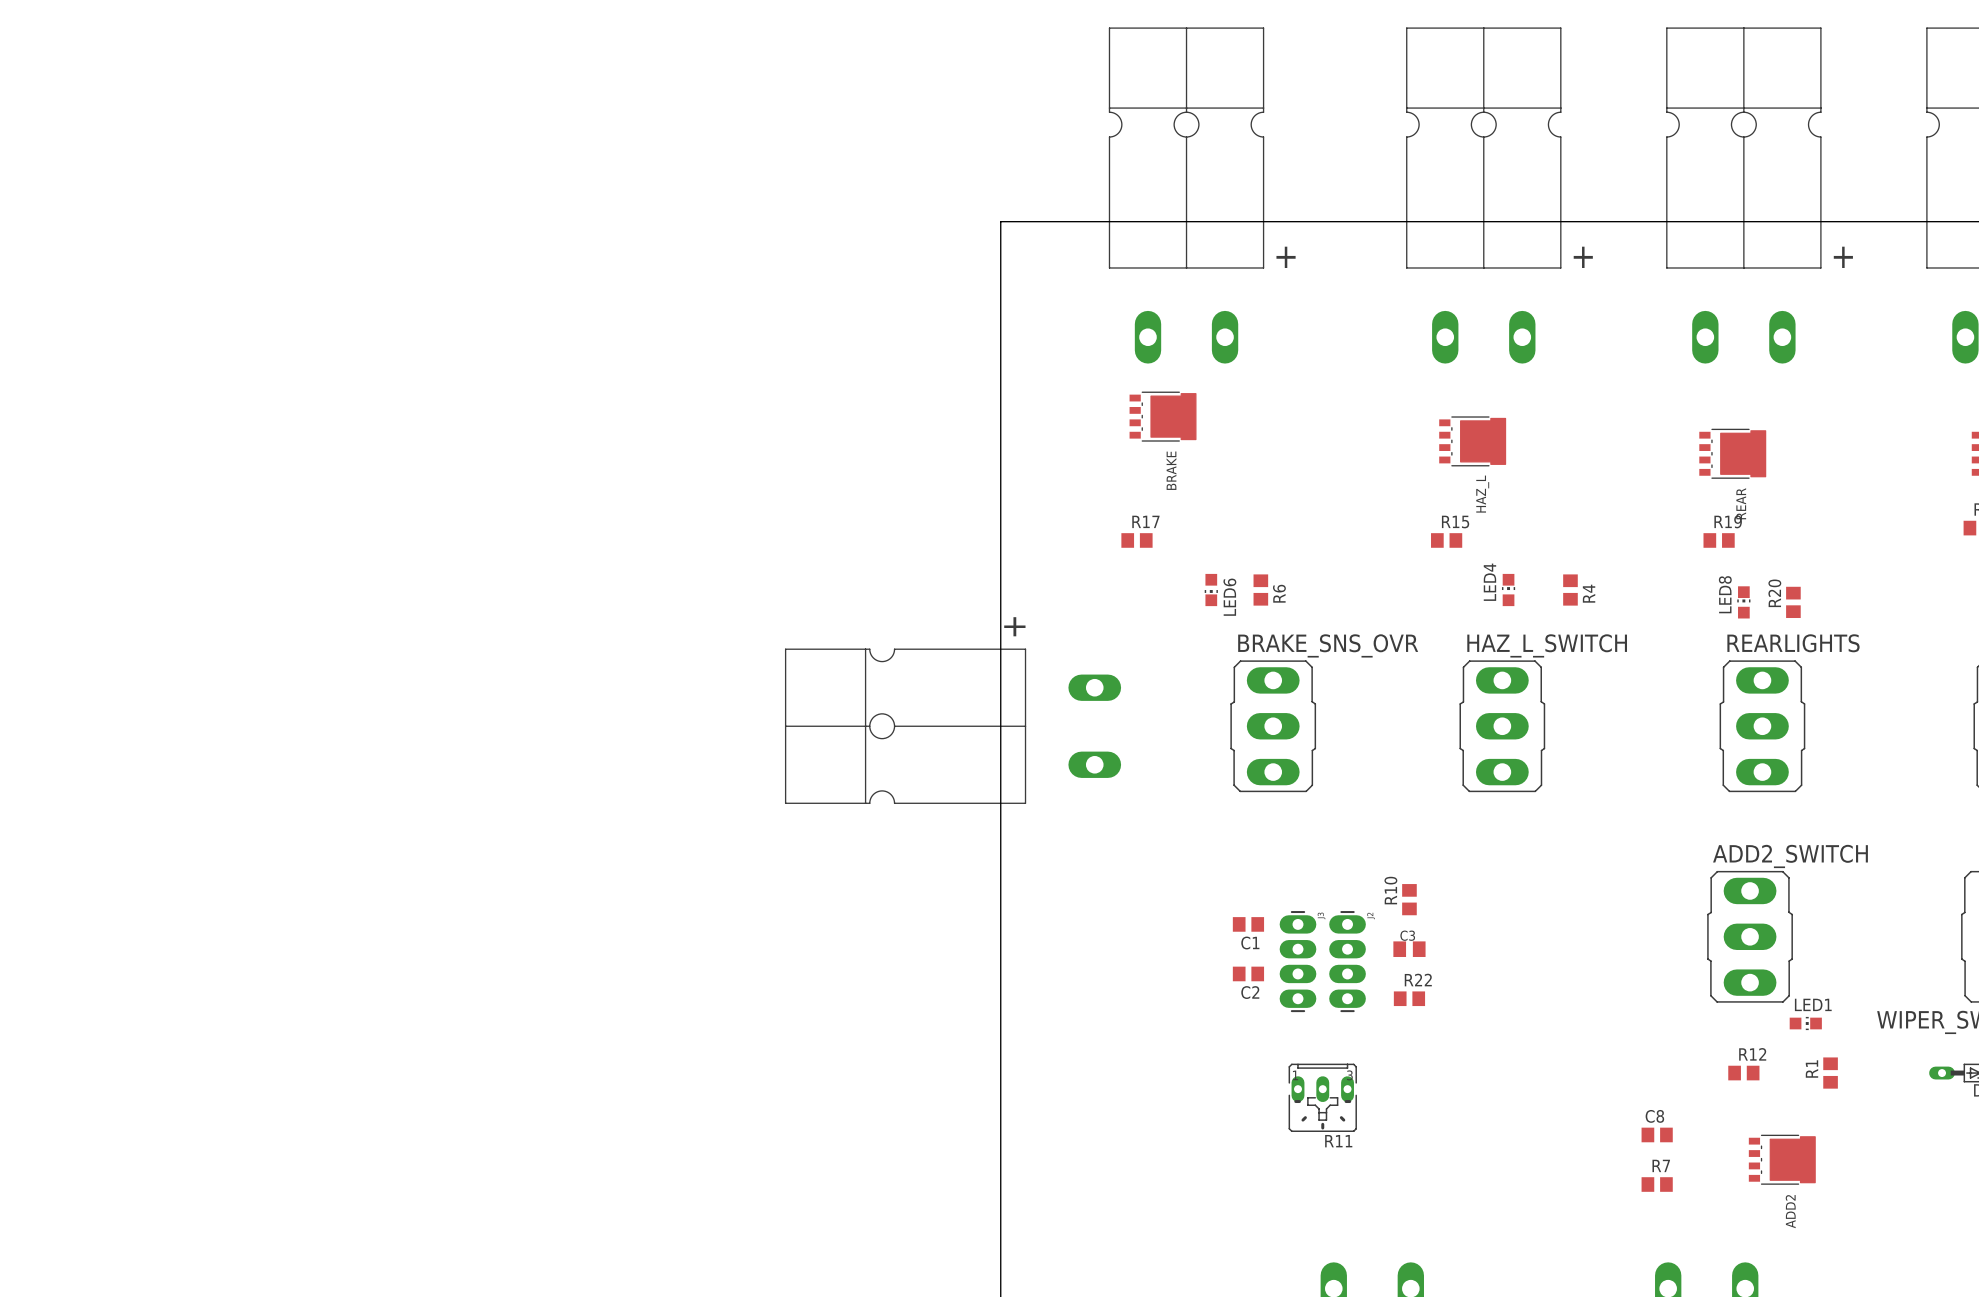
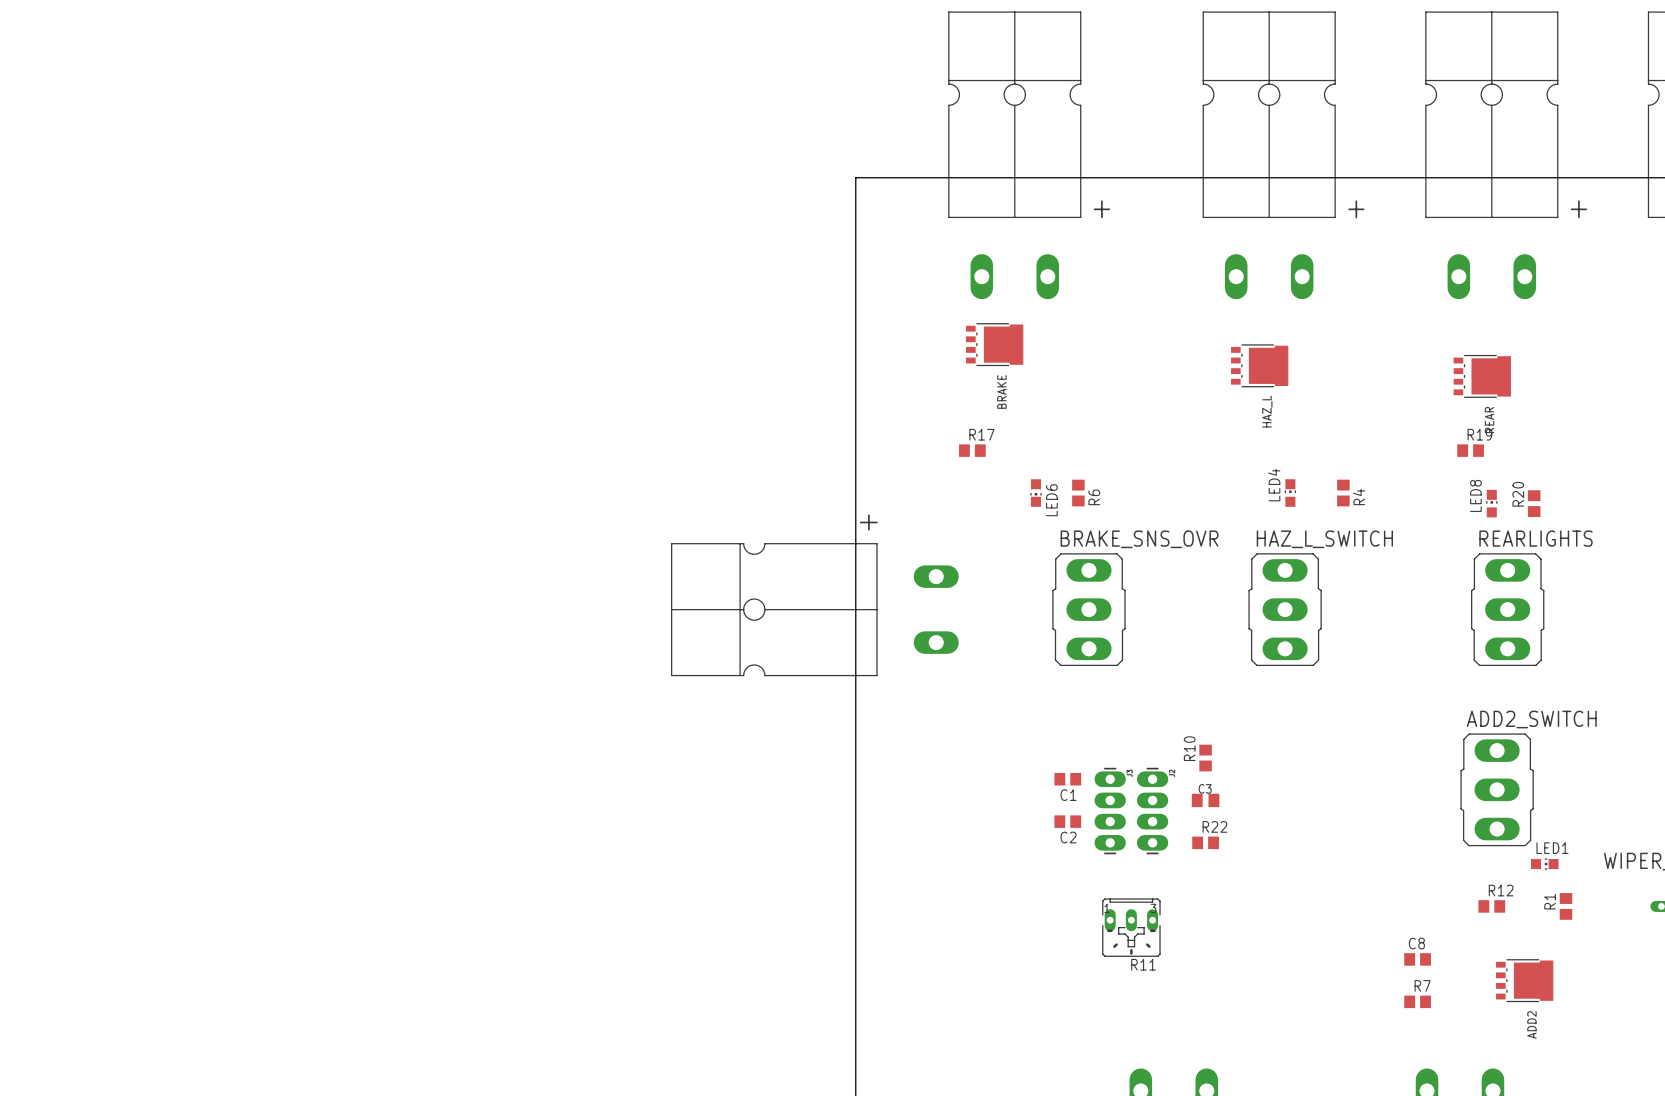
R15: (1446, 540) -> none

